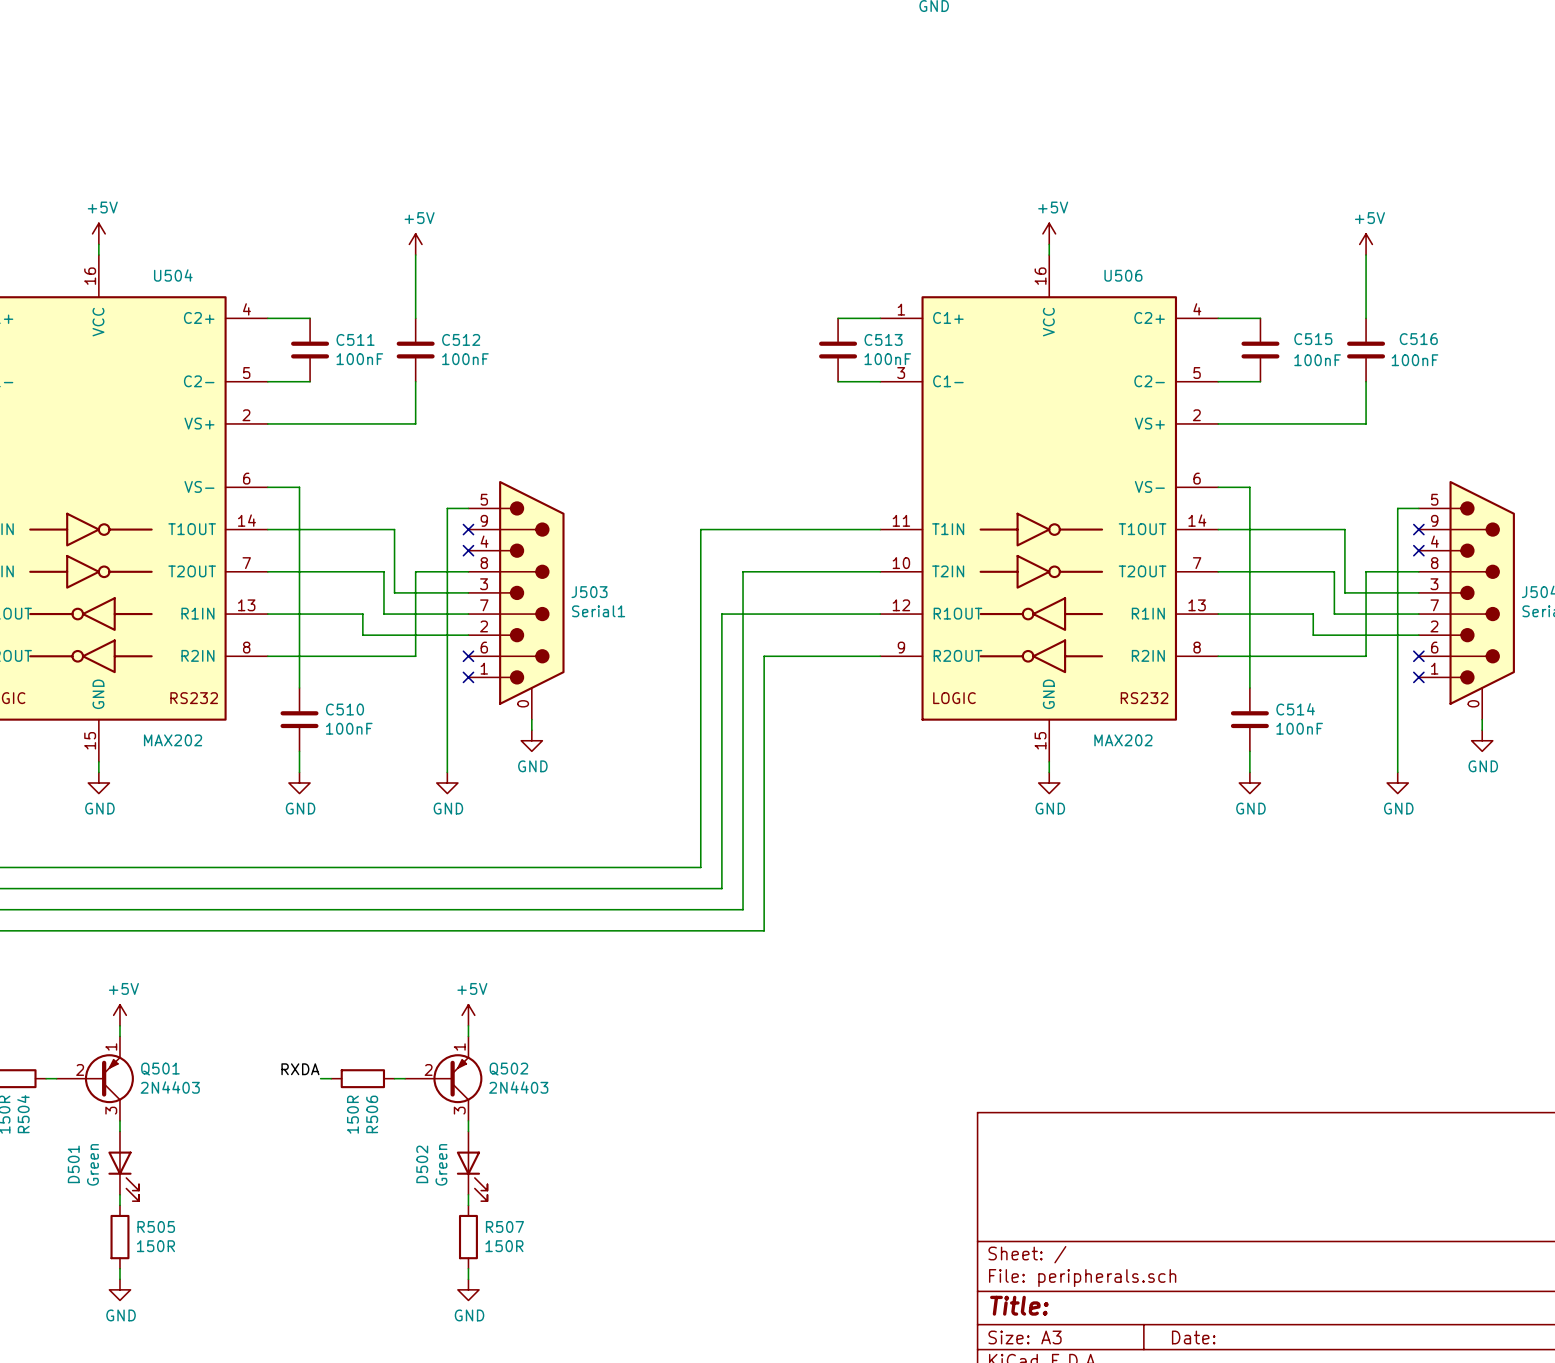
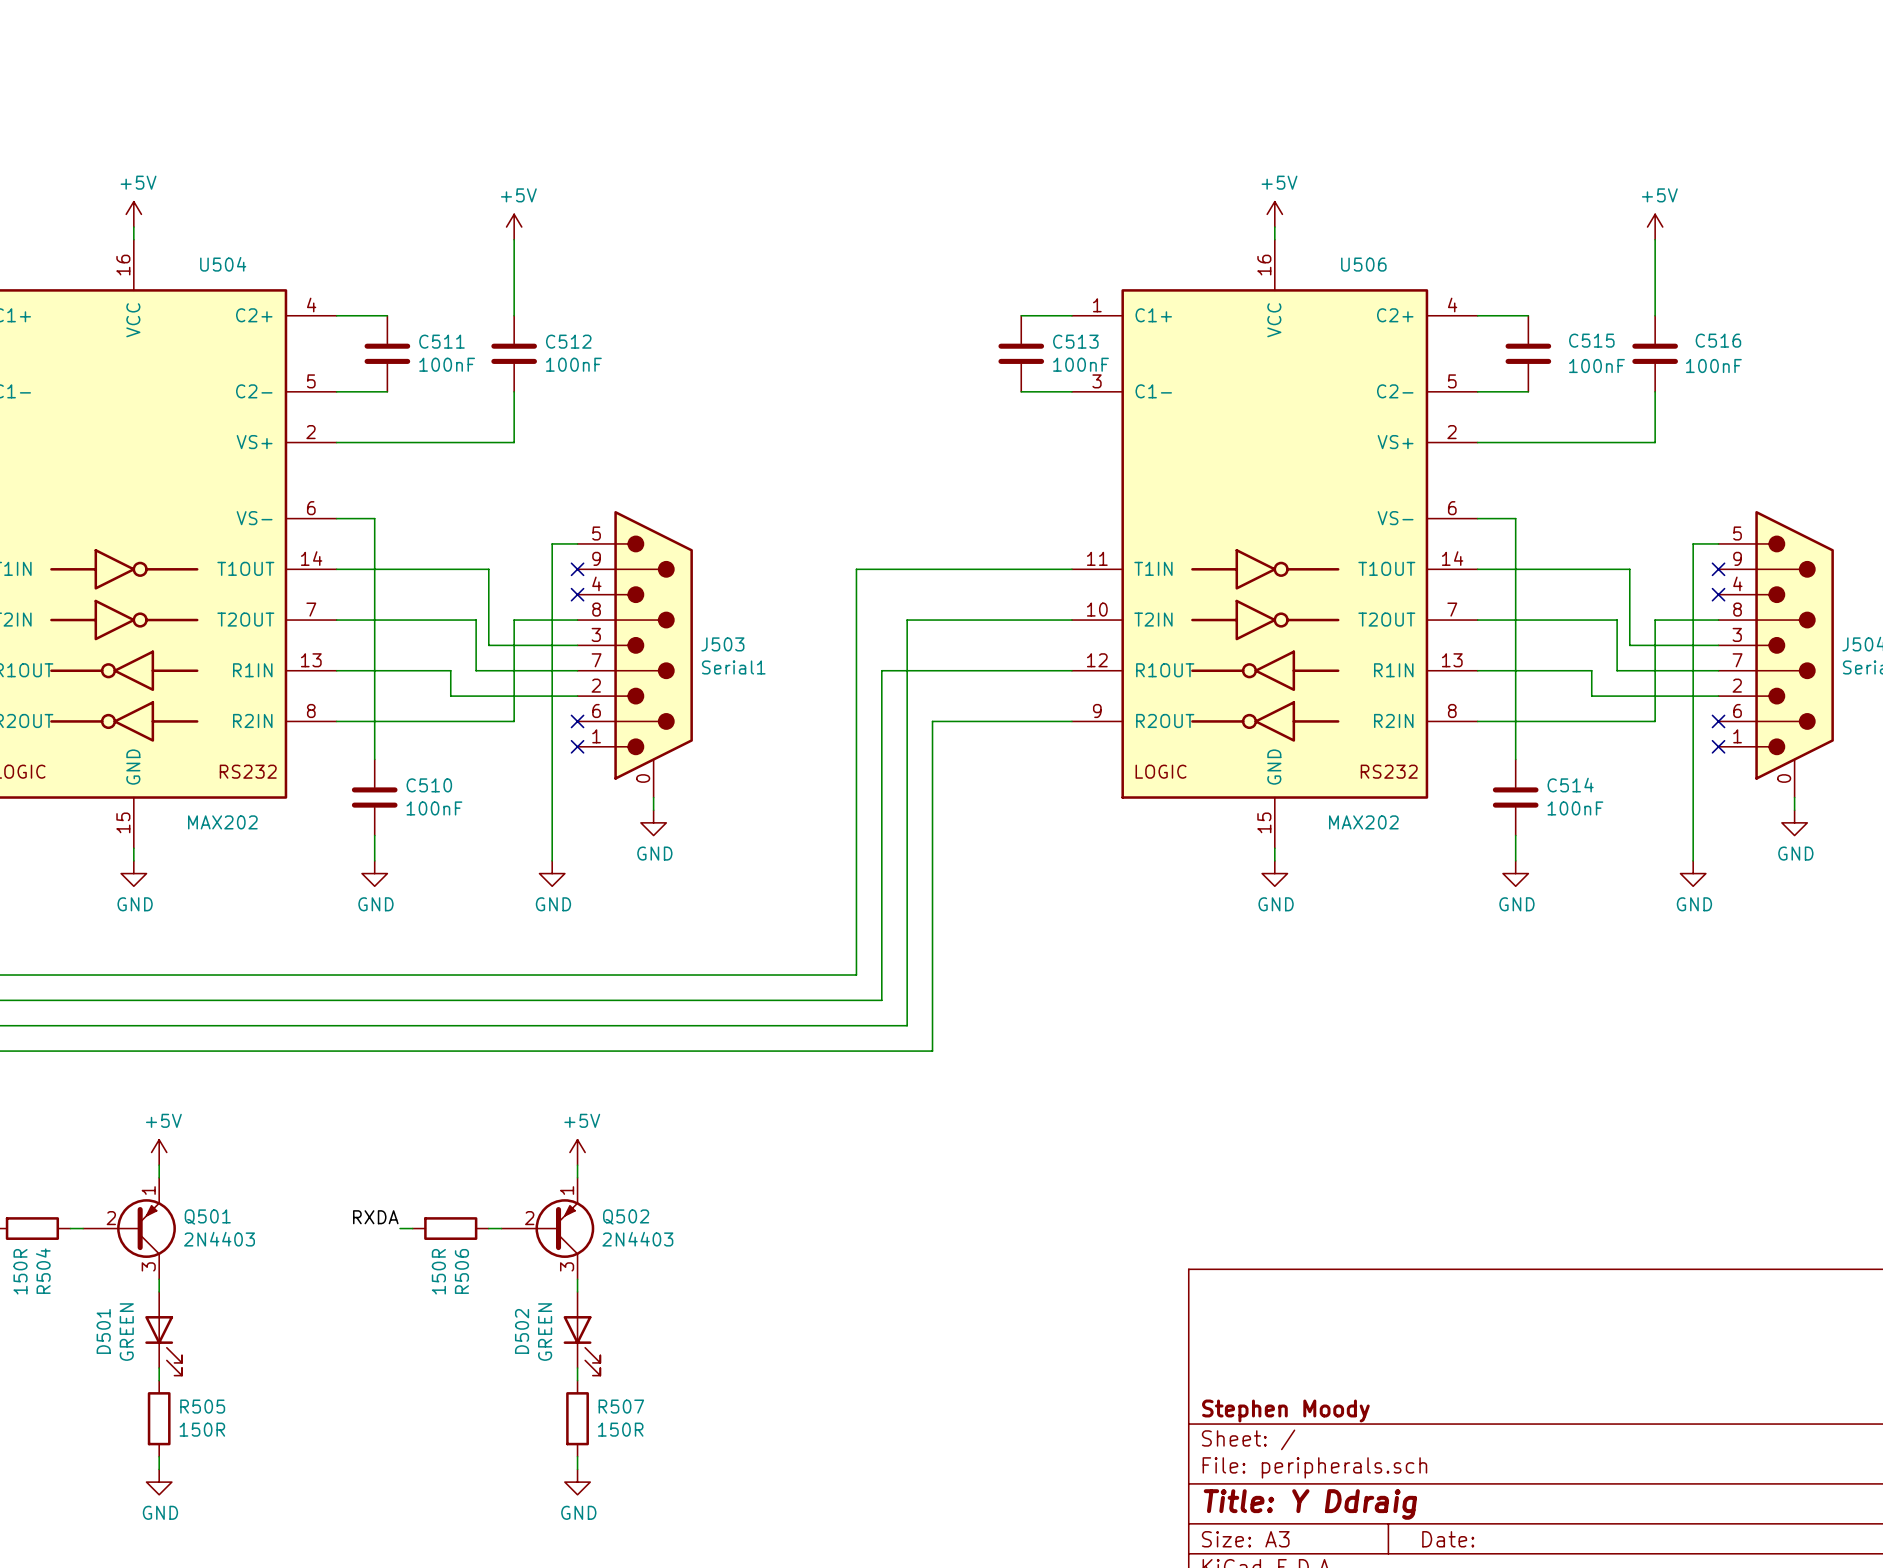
D501 value: Green (92, 1164) -> GREEN (126, 1332)
D502 value: Green (441, 1164) -> GREEN (545, 1332)
title block: none -> Stephen Moody (1285, 1410)
title block: Title: (1019, 1305) -> Title: Y Ddraig (1310, 1504)

